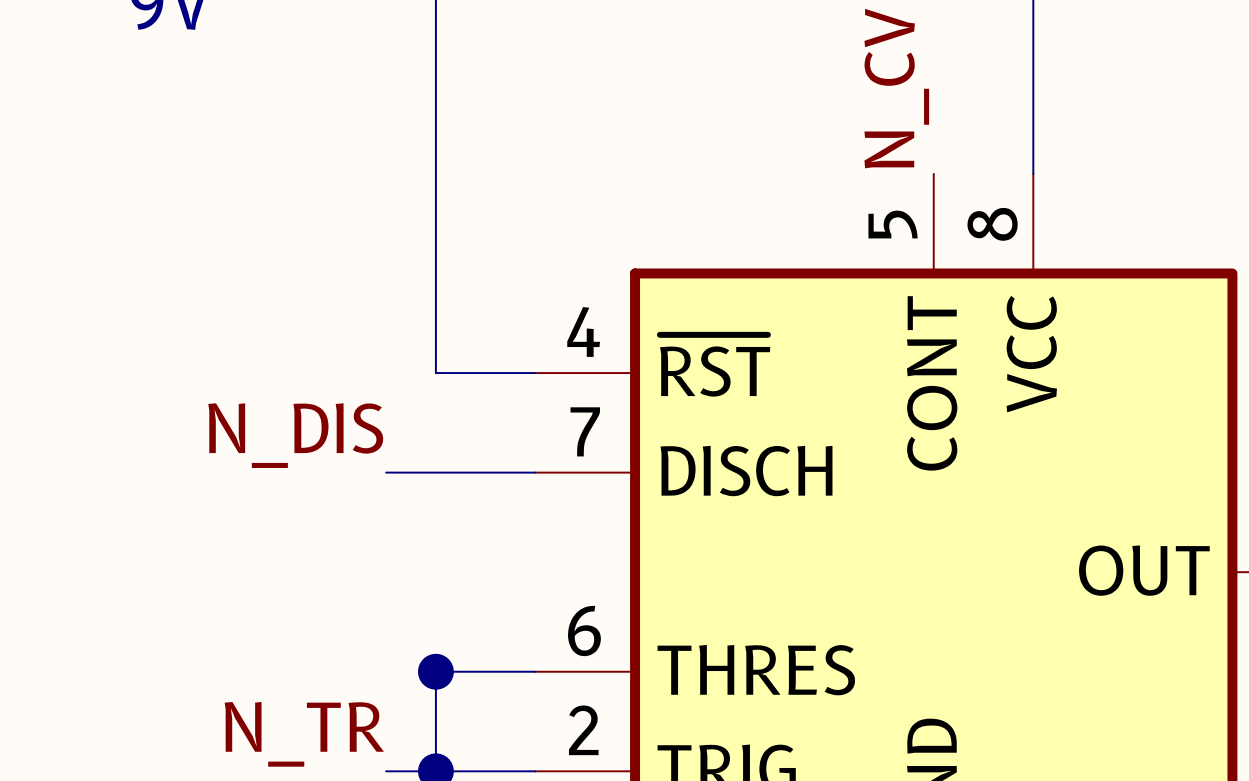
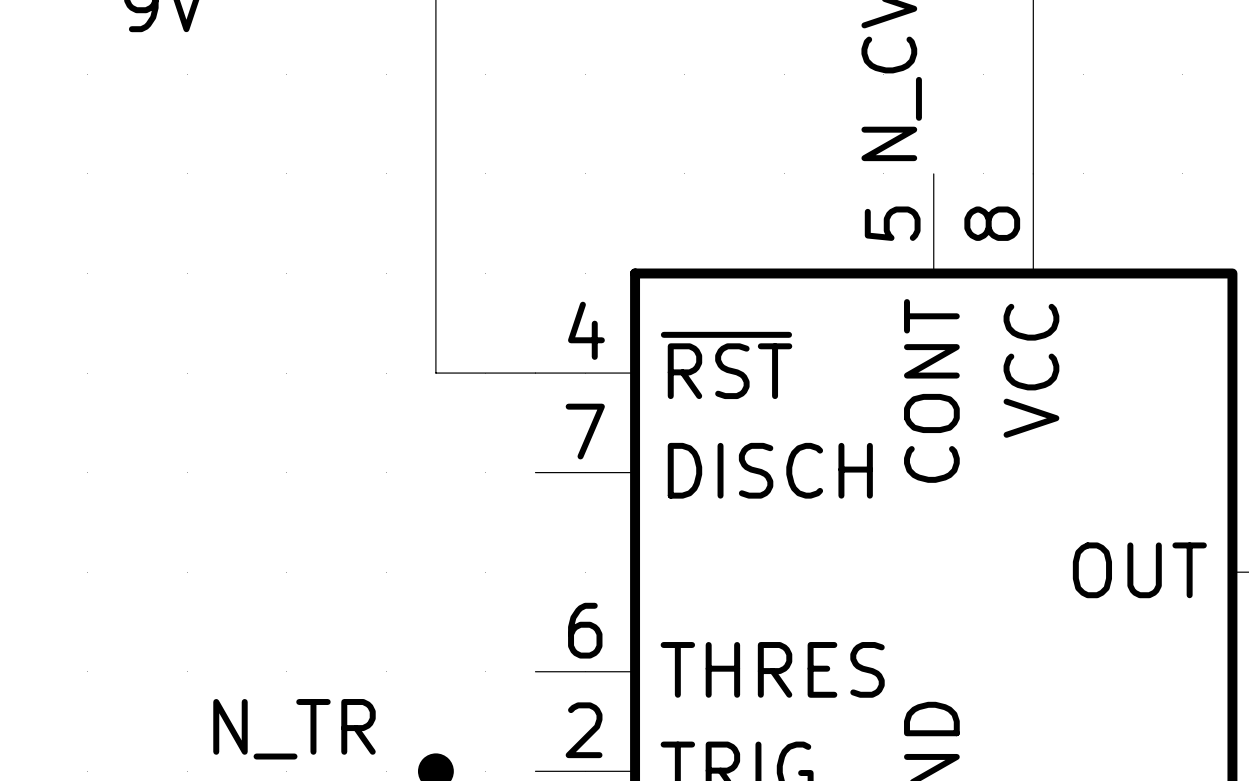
label: N_DIS (295, 435) -> none
wire: (386, 472) (535, 472) -> none
junction: (435, 671) -> none
wire: (535, 671) (435, 671) (435, 771) -> none
wire: (386, 771) (535, 771) -> none

